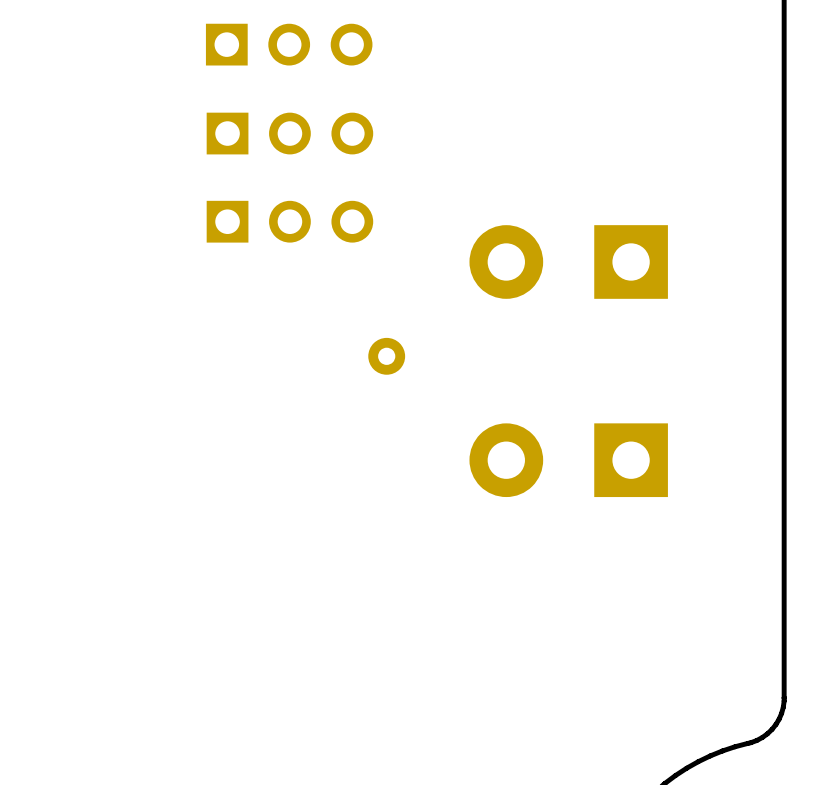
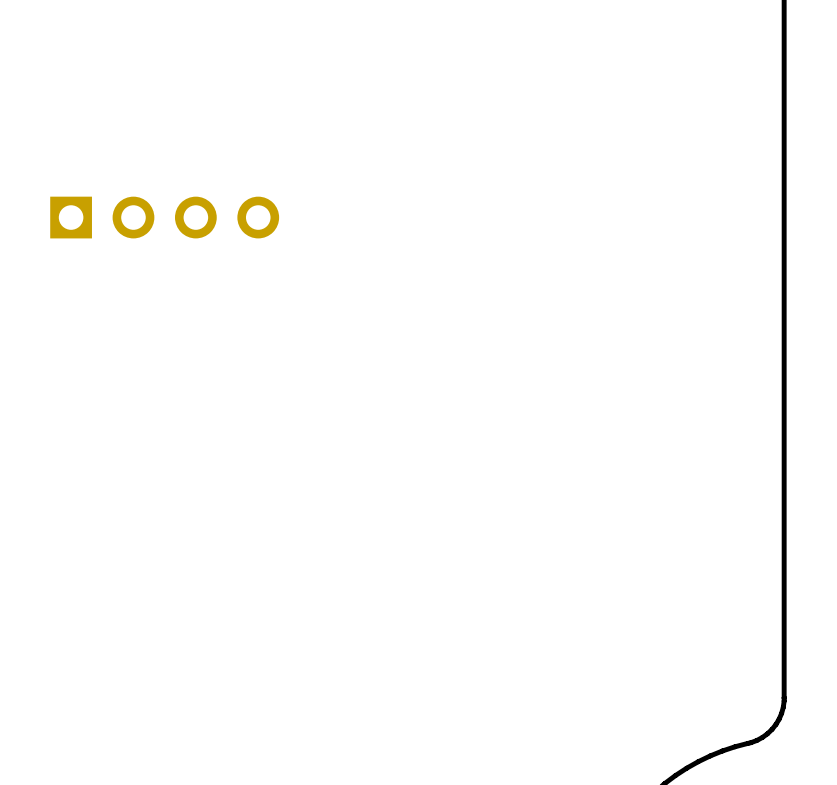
part: (289, 44) -> none
part: (289, 133) -> none
part: none -> (164, 217)
part: (289, 221) -> none
part: (568, 261) -> none
part: (386, 356) -> none
part: (568, 460) -> none

